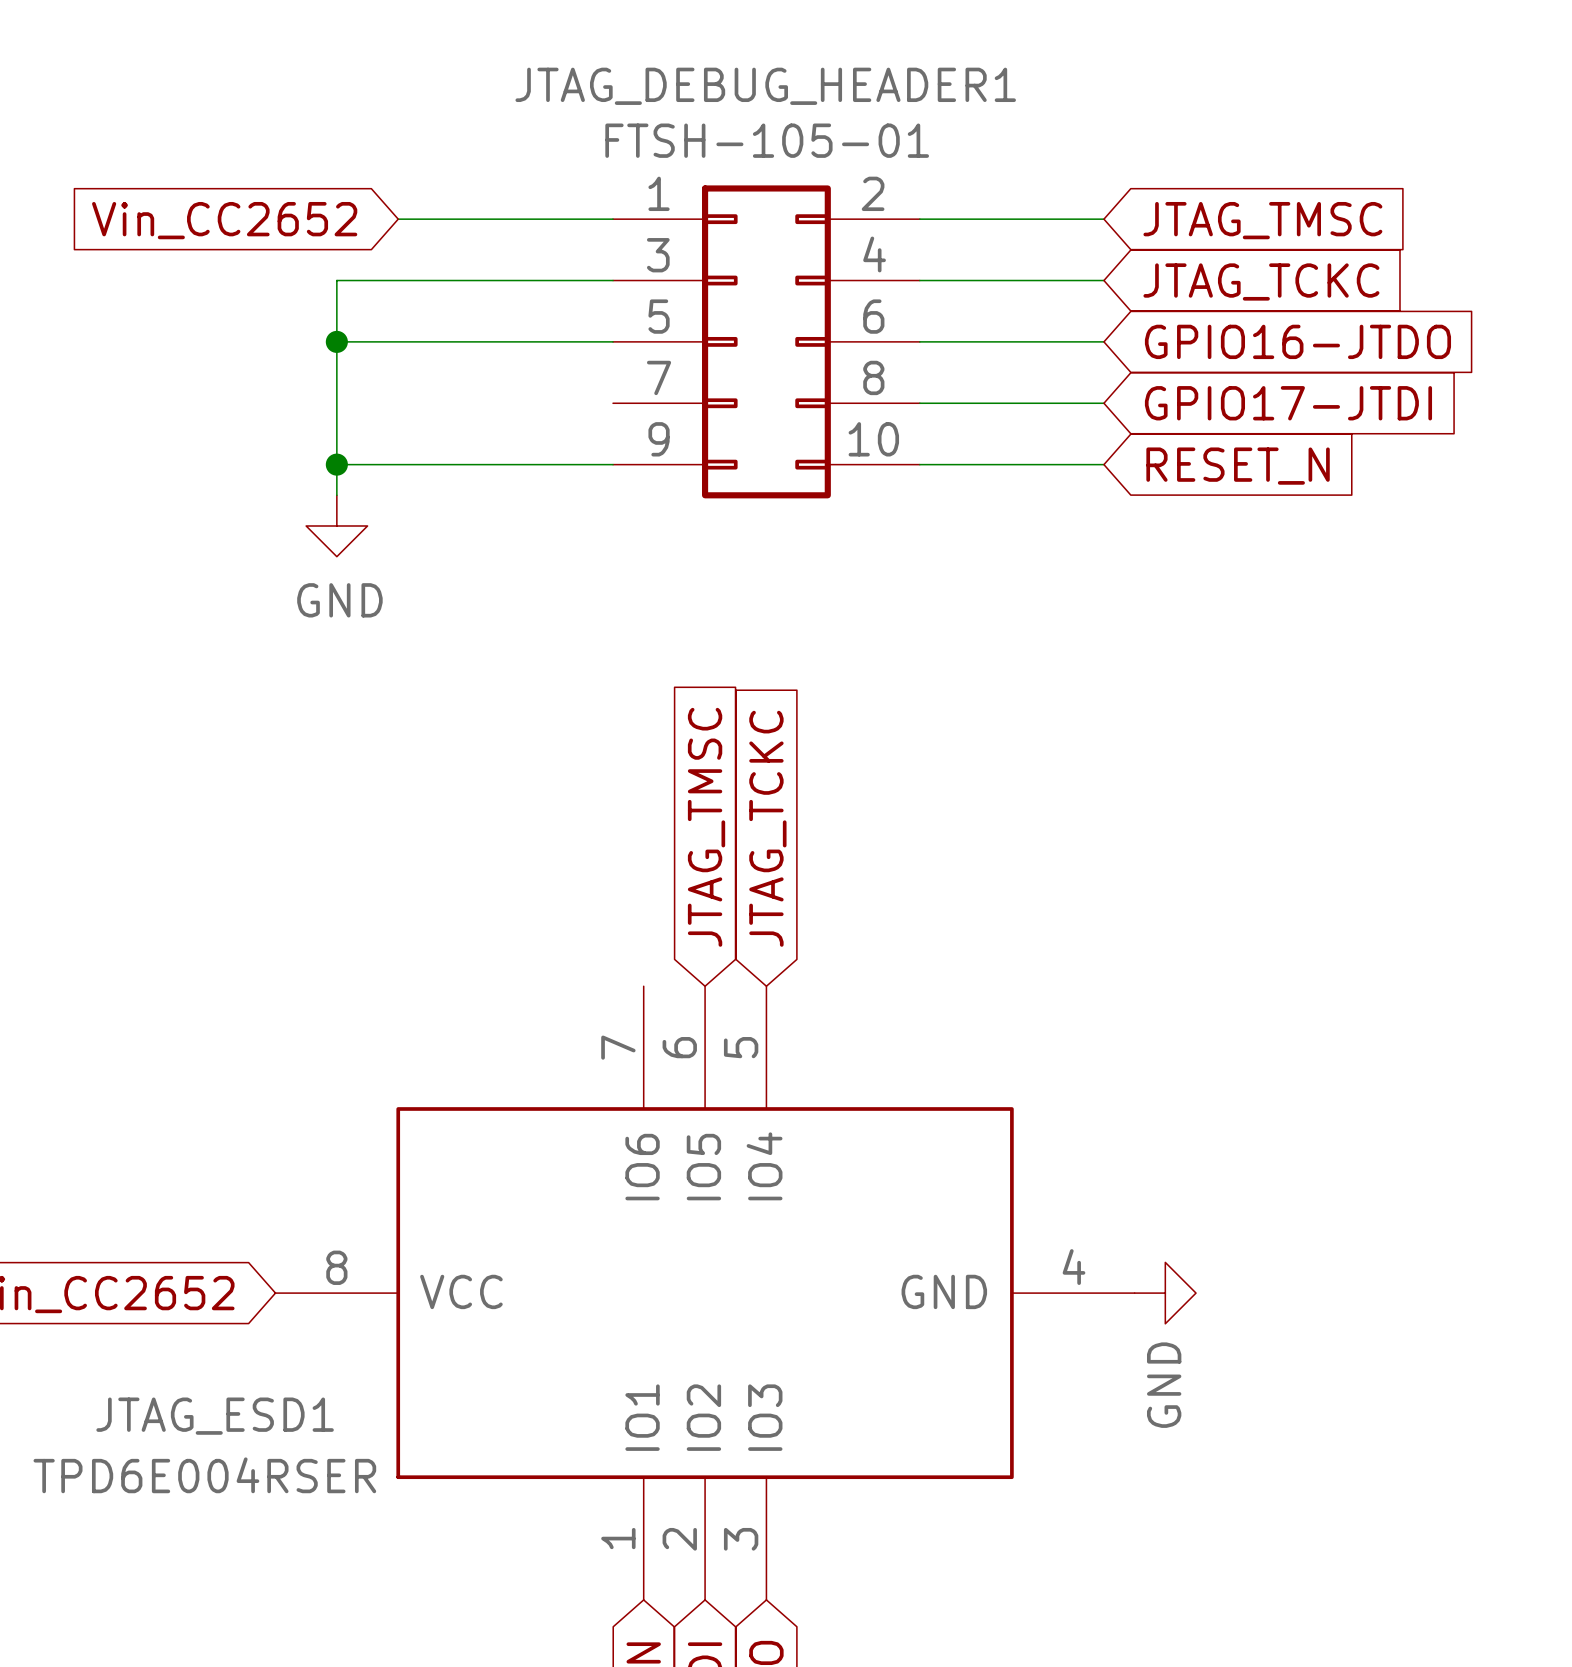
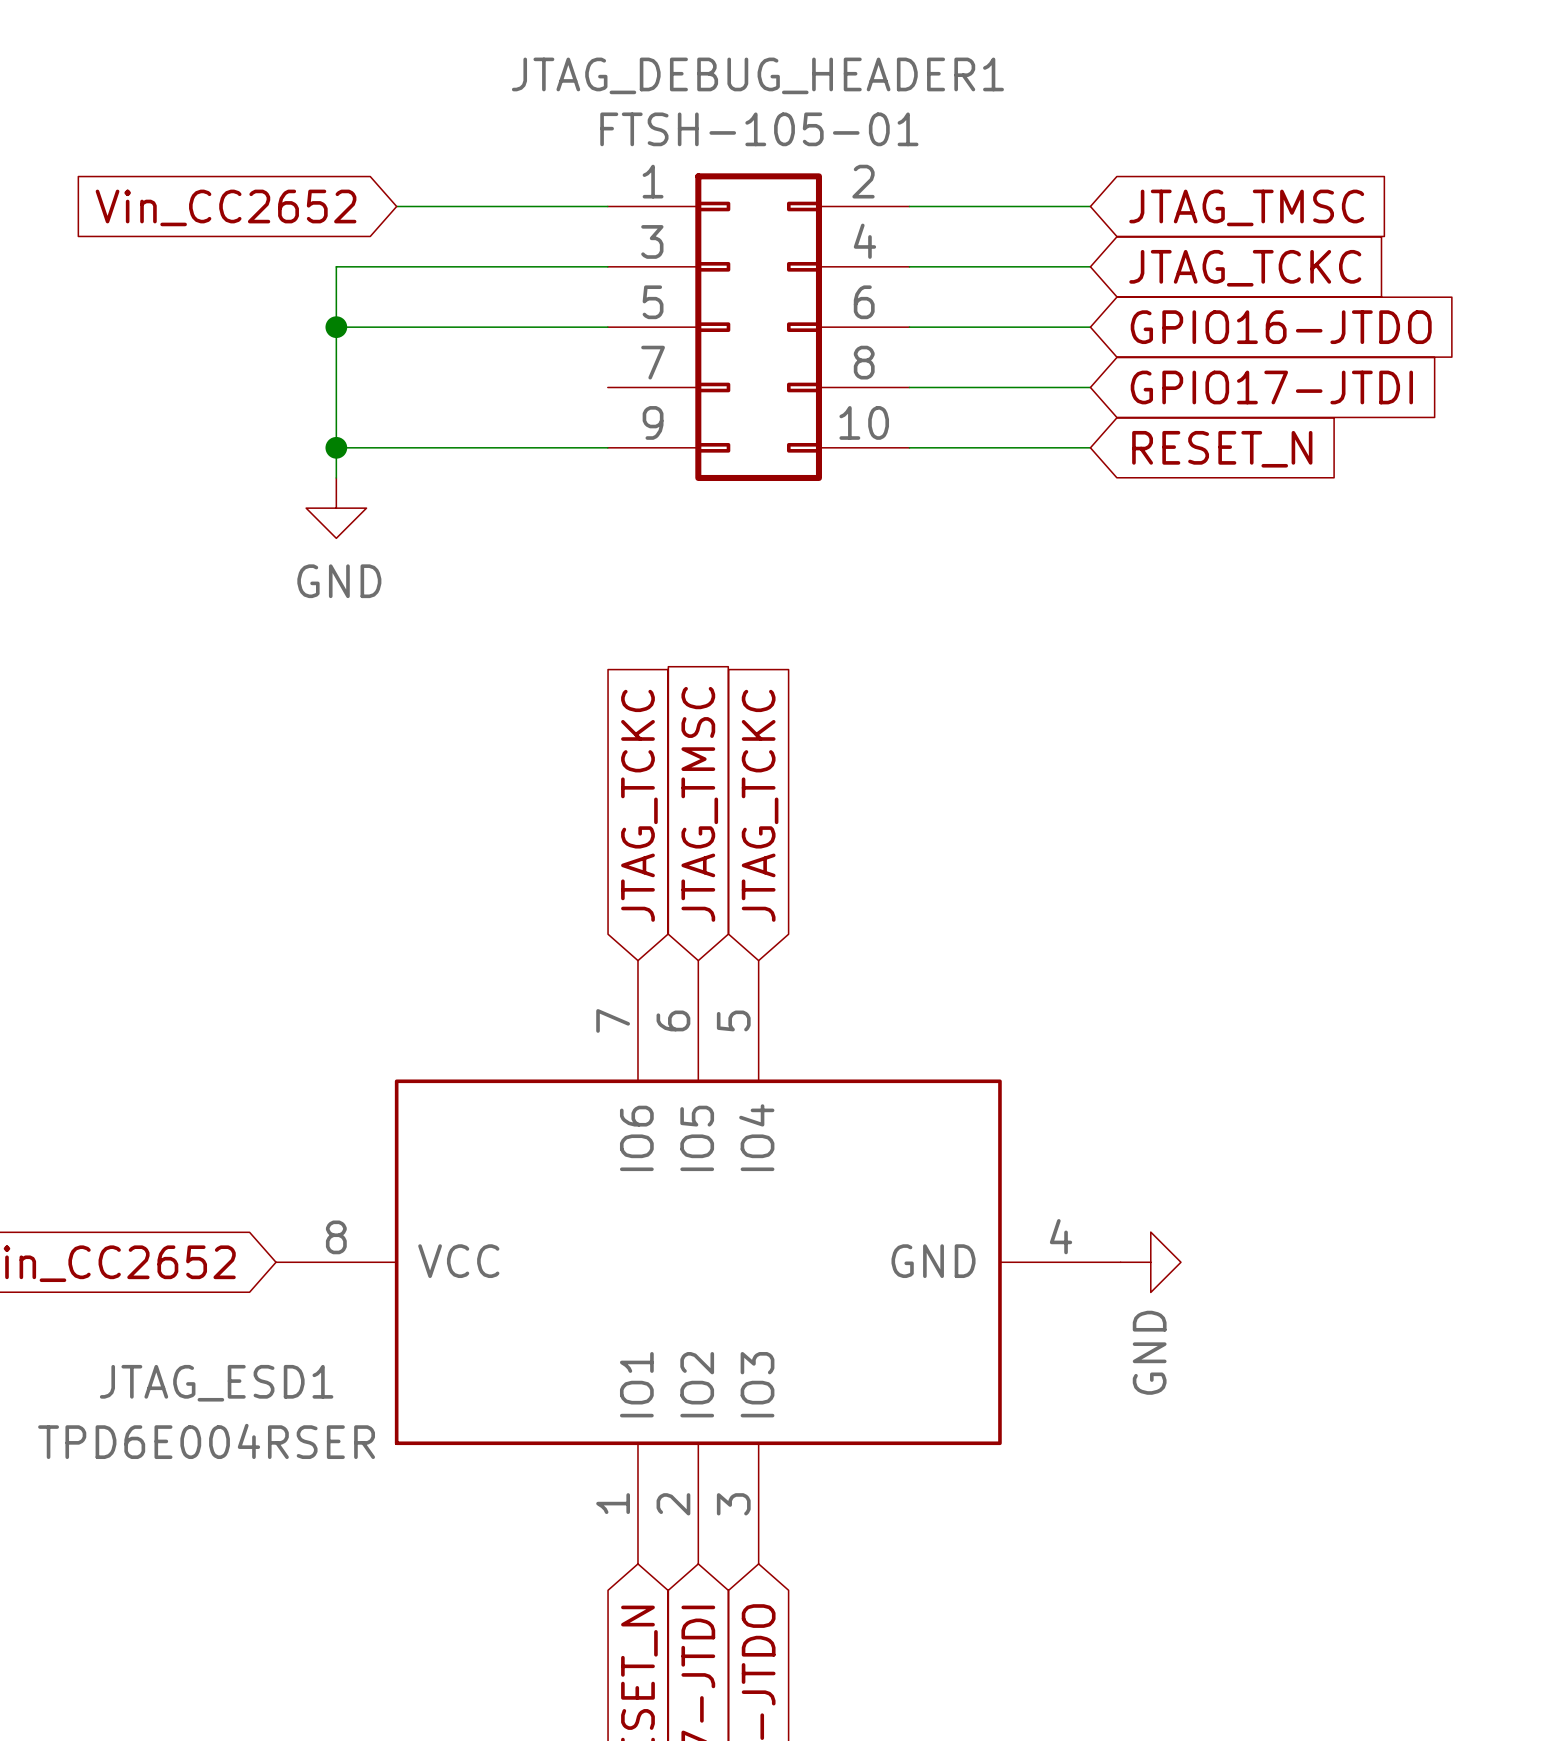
global label: none -> JTAG_TCKC (639, 805)

